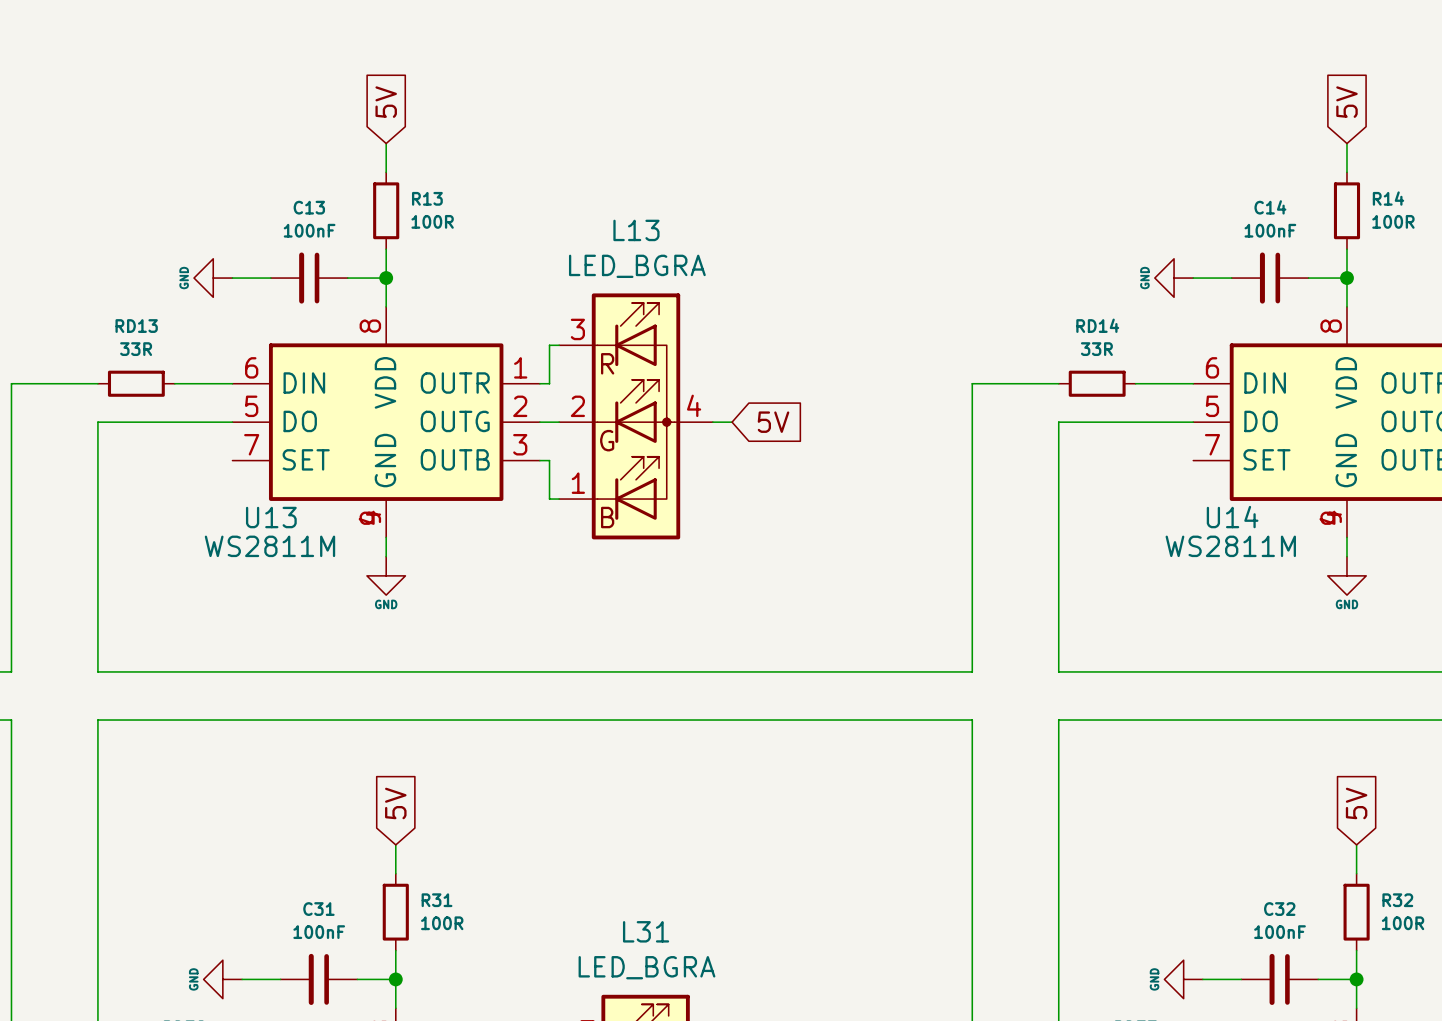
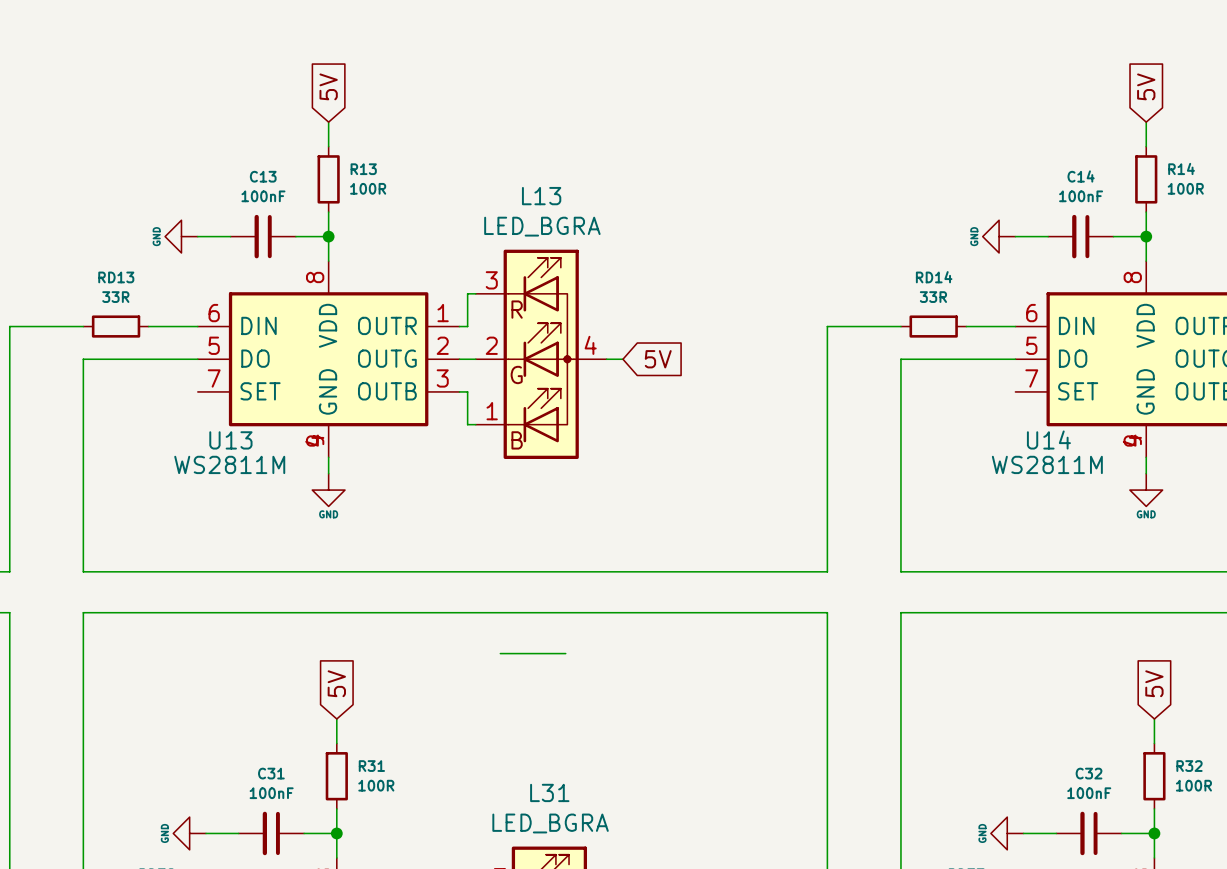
wire: none -> (500, 653) (565, 653)

